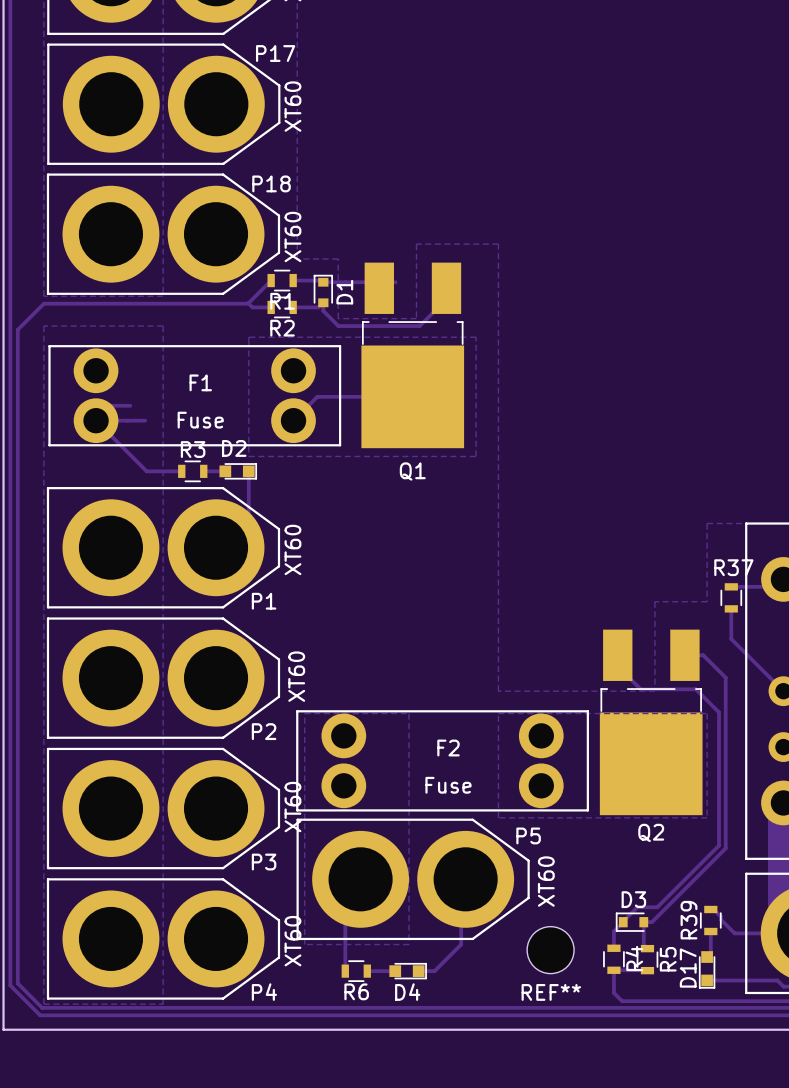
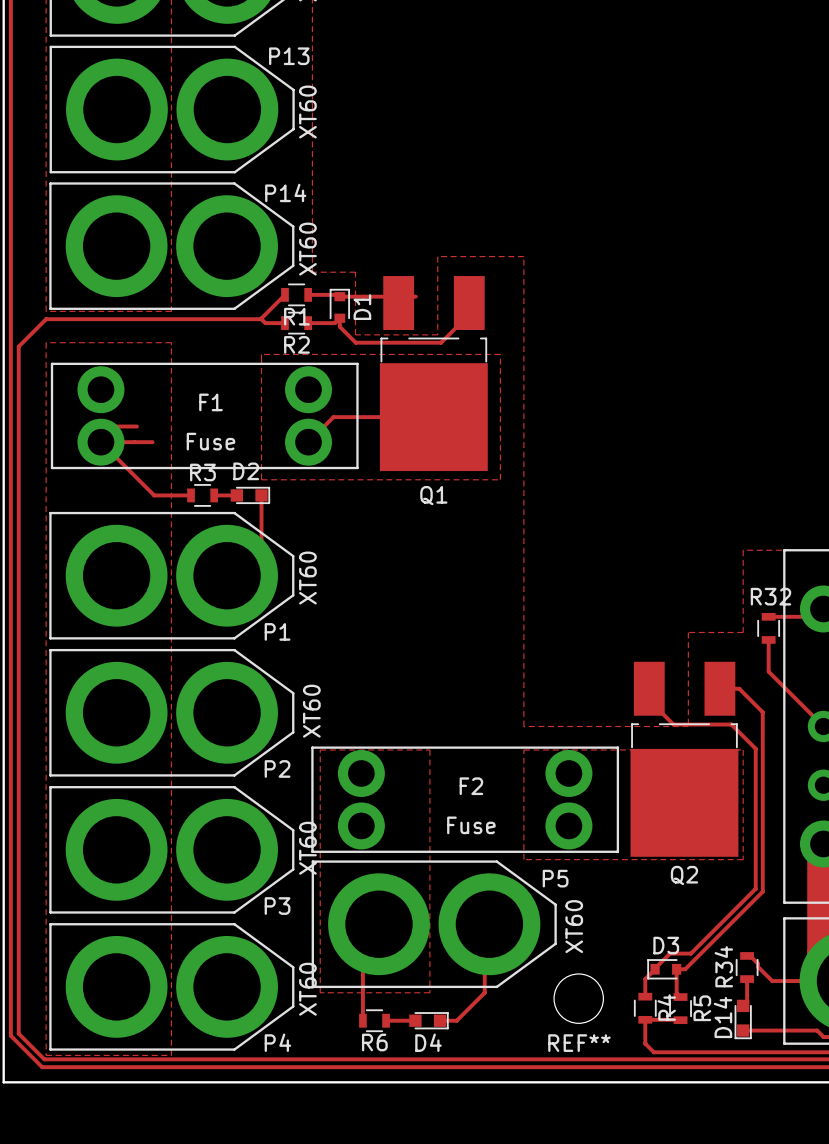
P17 name: P17 (275, 53) -> P13 (289, 56)
P18 name: P18 (271, 183) -> P14 (285, 192)
R37 name: R37 (733, 567) -> R32 (770, 596)
R39 name: R39 (689, 920) -> R34 (723, 966)
D17 name: D17 (688, 968) -> D14 (722, 1017)

